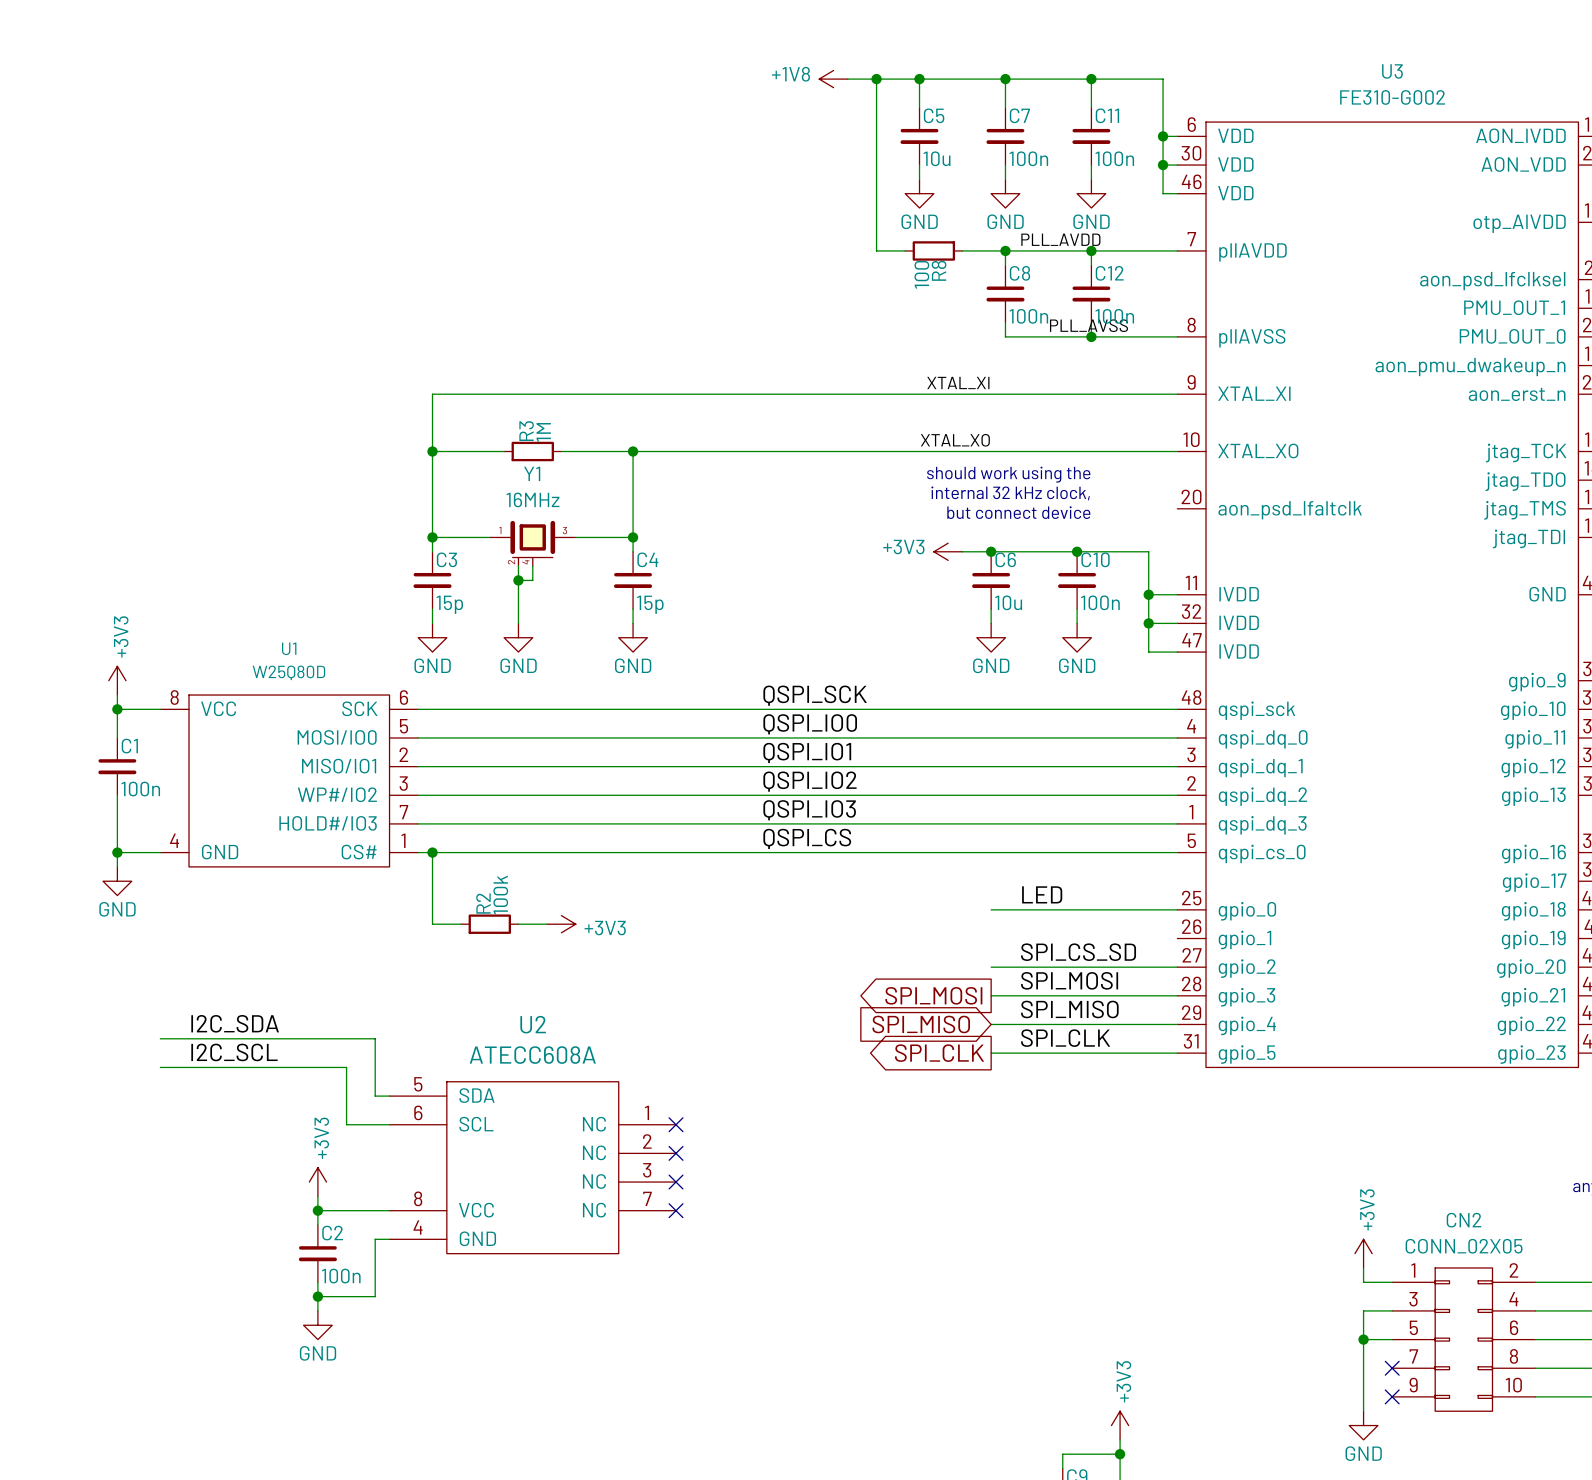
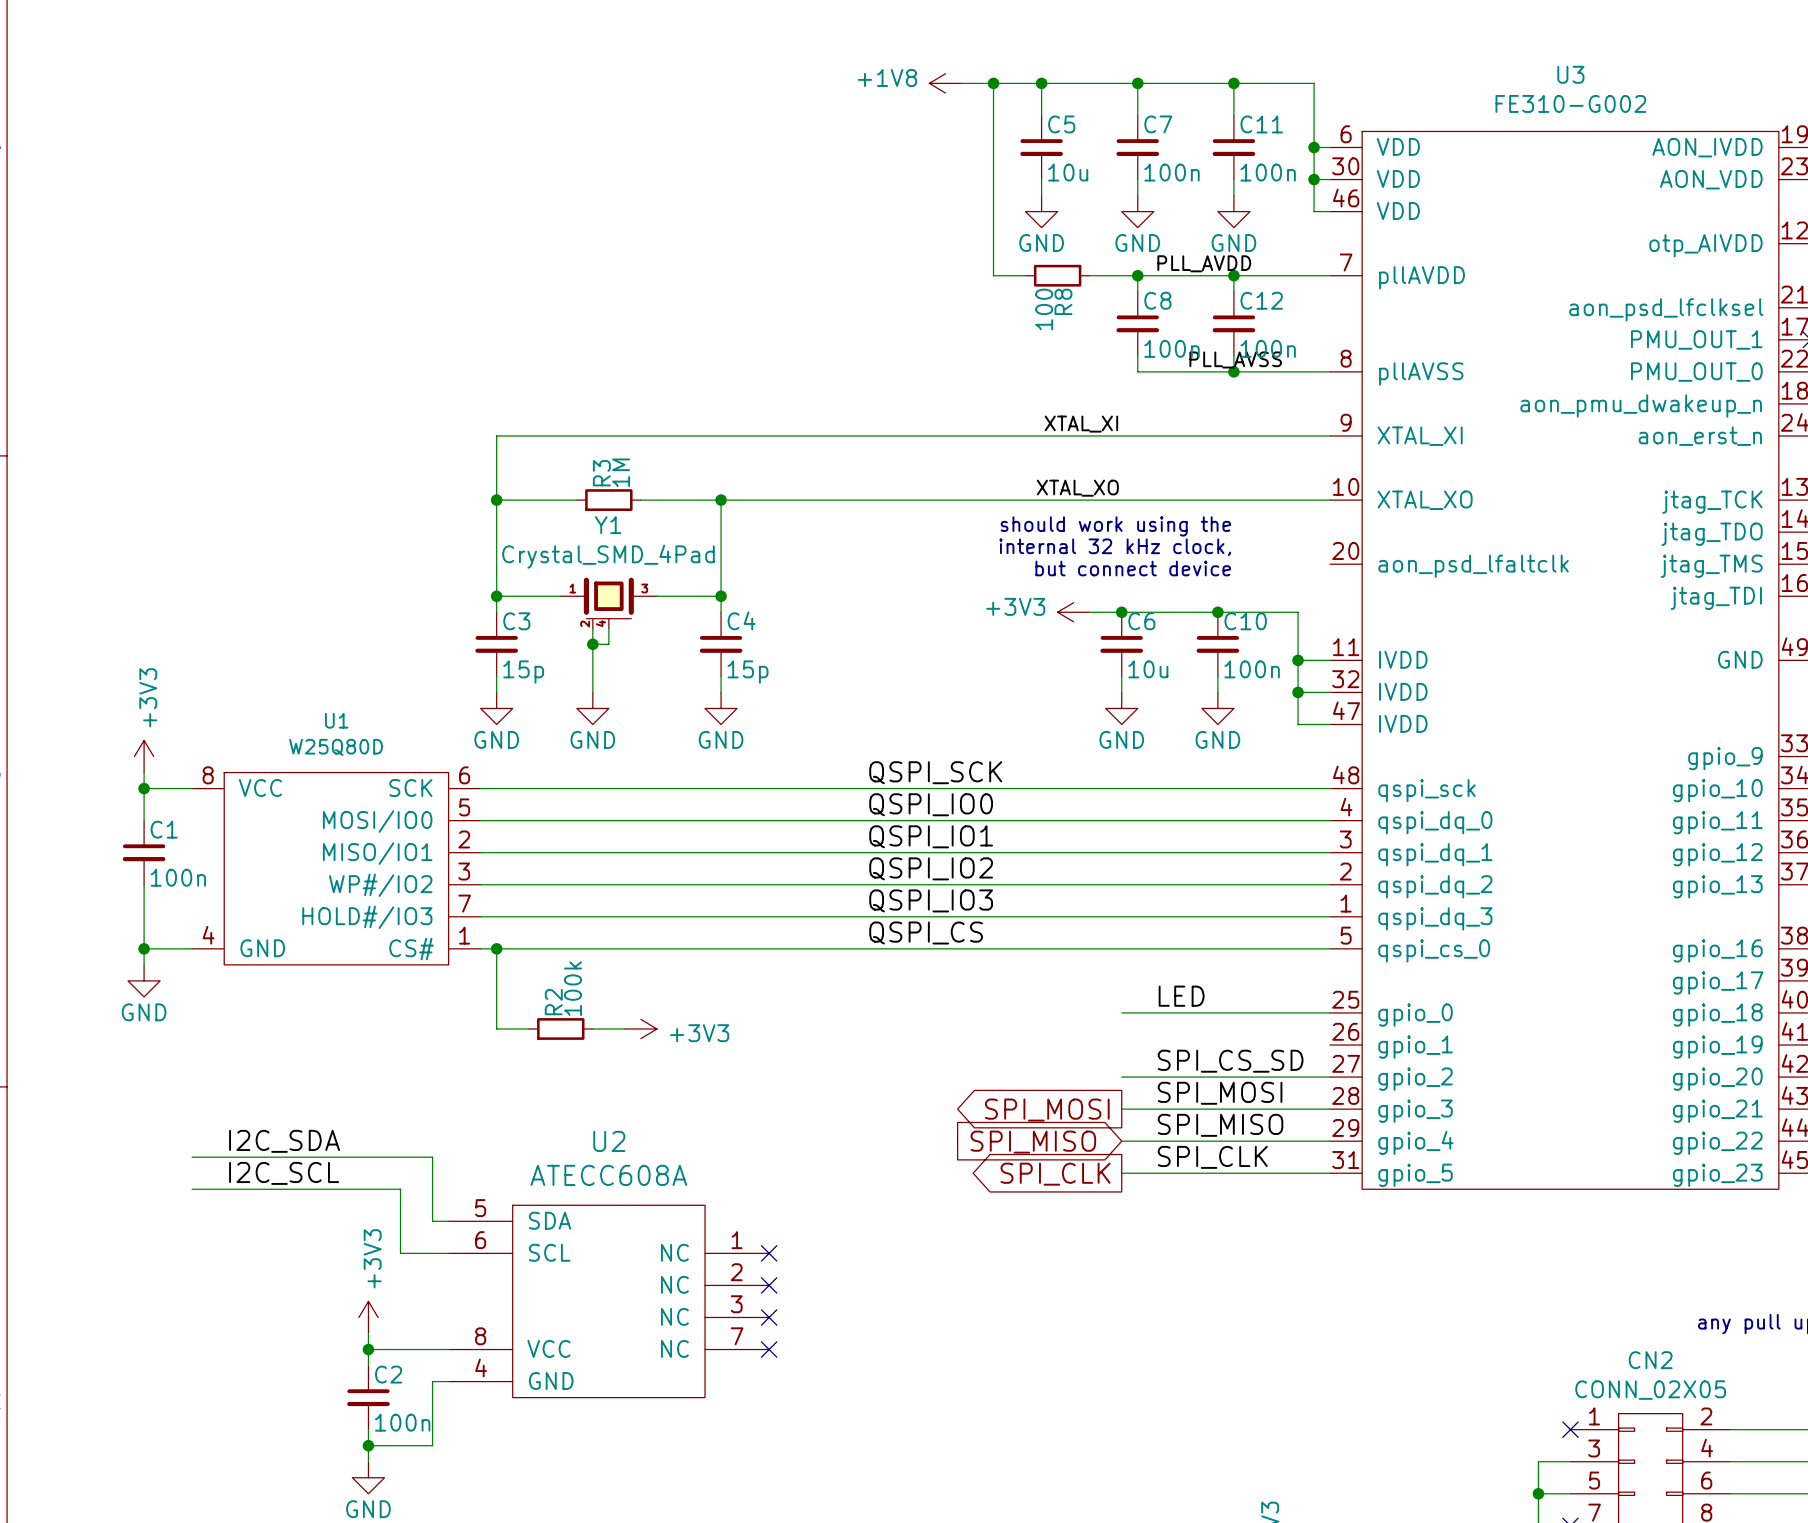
Y1 value: 16MHz (533, 499) -> Crystal_SMD_4Pad (608, 556)
power symbol: +3V3 (1363, 1253) -> none
wire: (1363, 1267) (1363, 1282) (1392, 1282) -> none
no-connect mark: none -> (1570, 1429)

